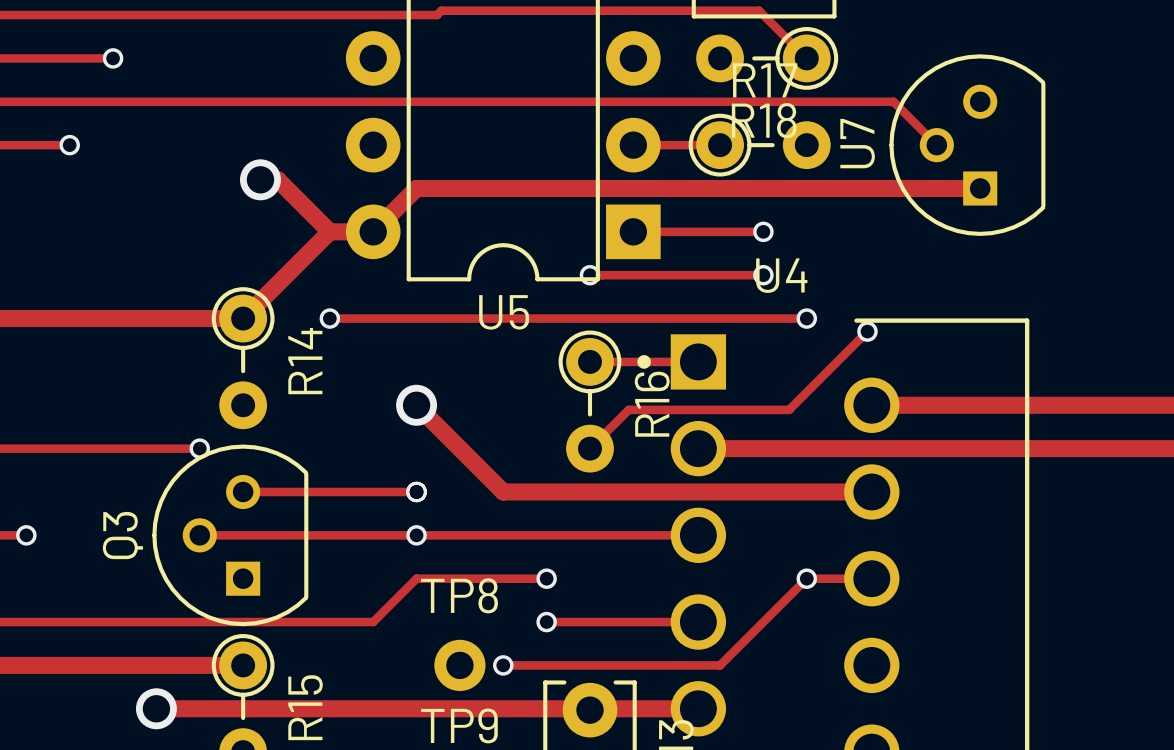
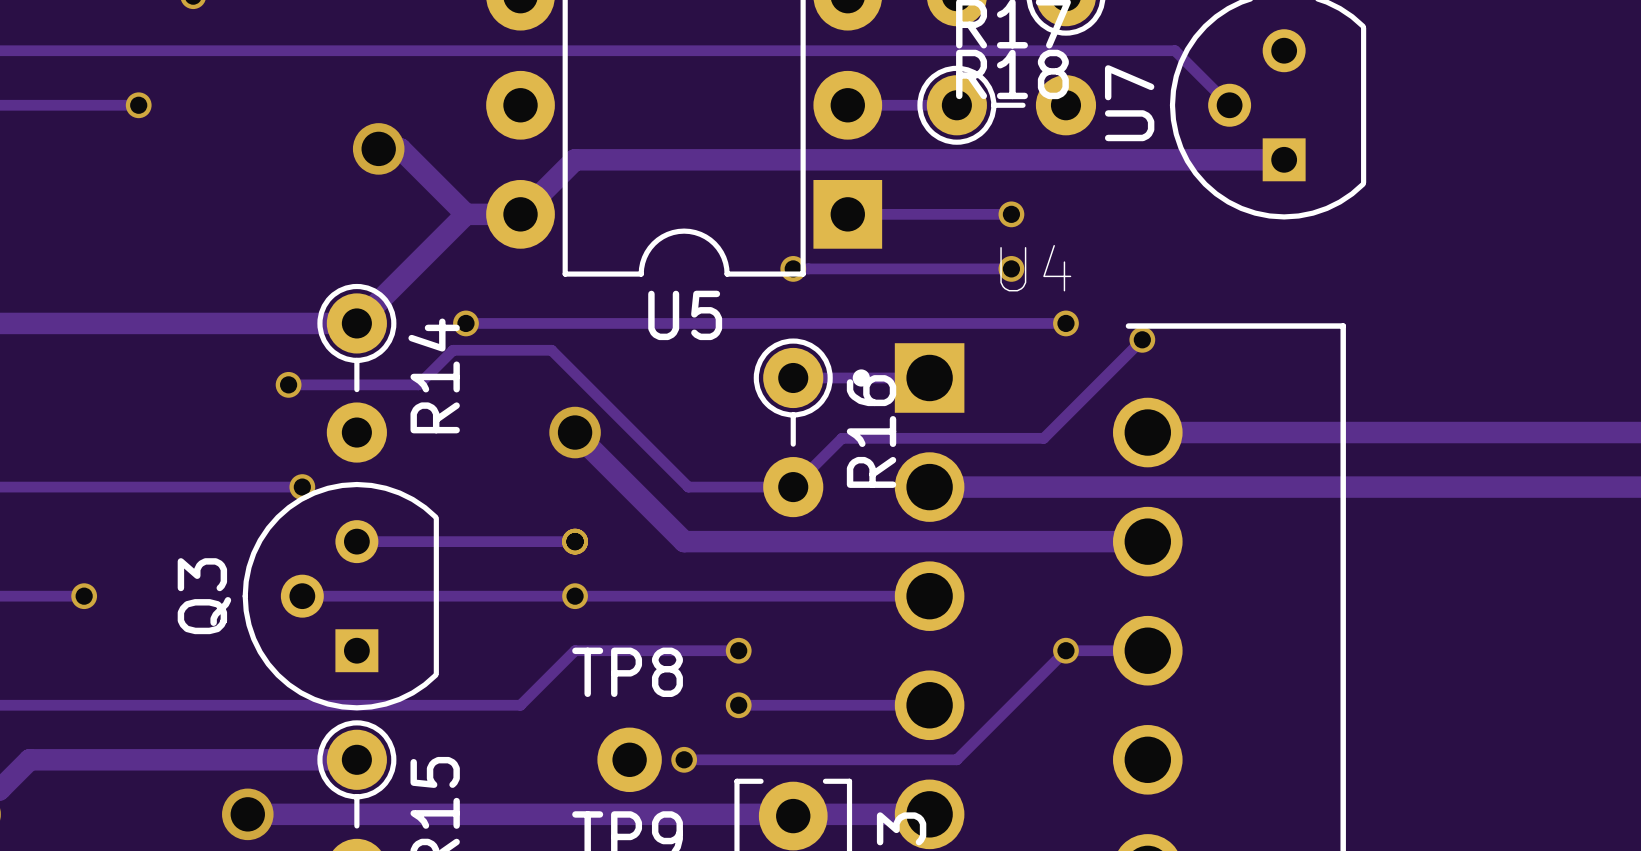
track: none -> (288, 384) (418, 384) (453, 350) (551, 350) (688, 487) (793, 487)
via: none -> (288, 384)

